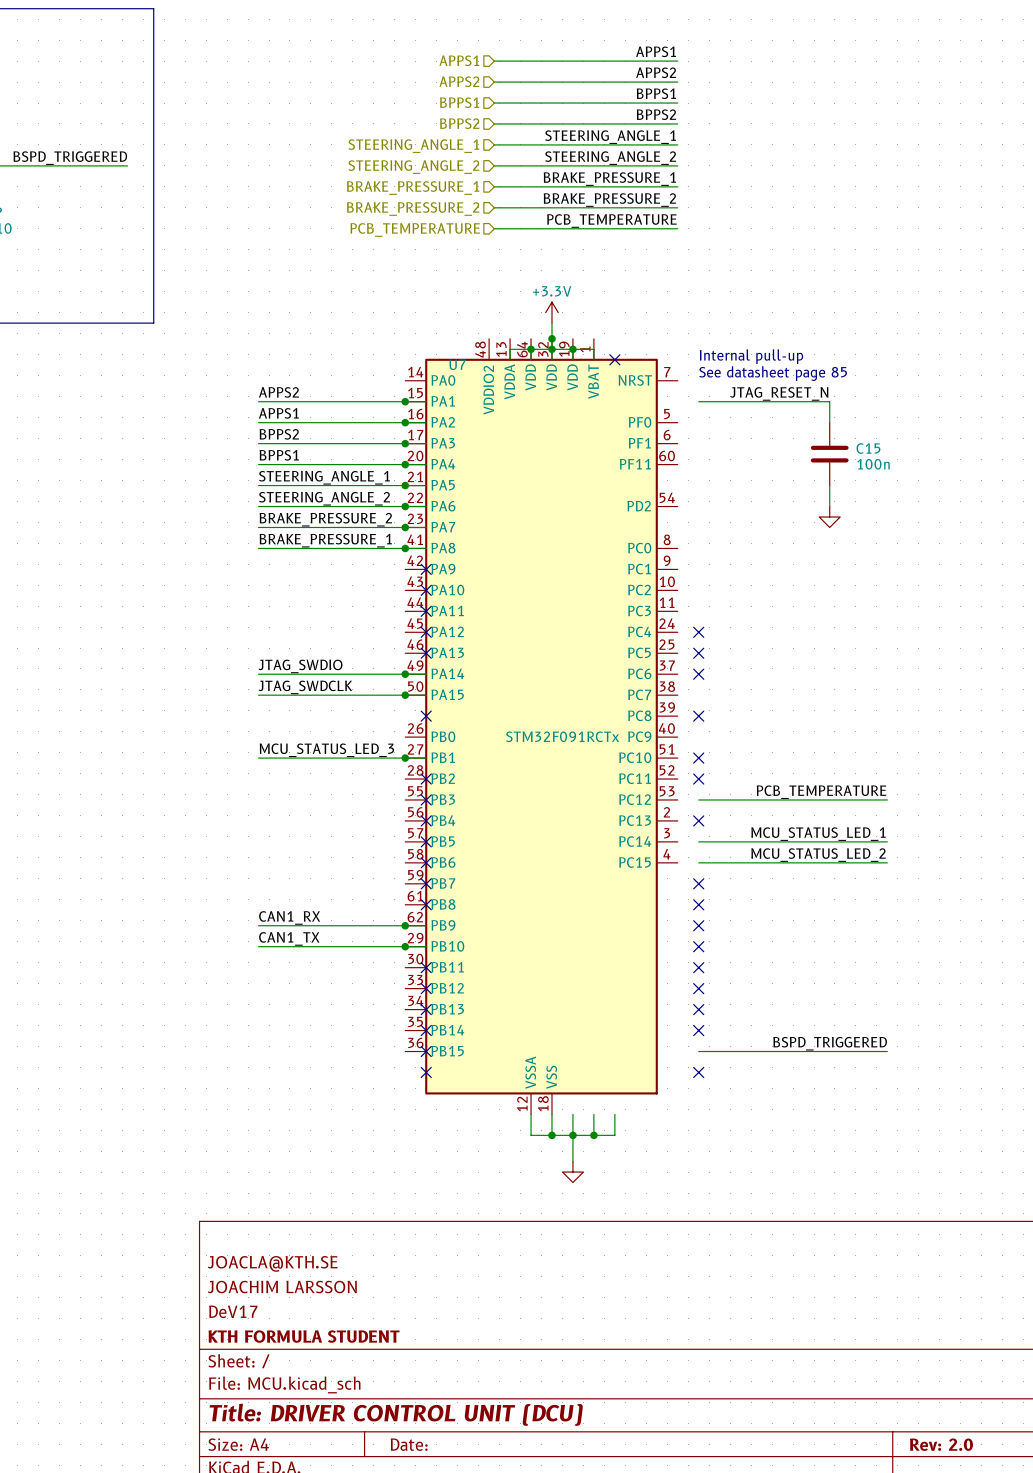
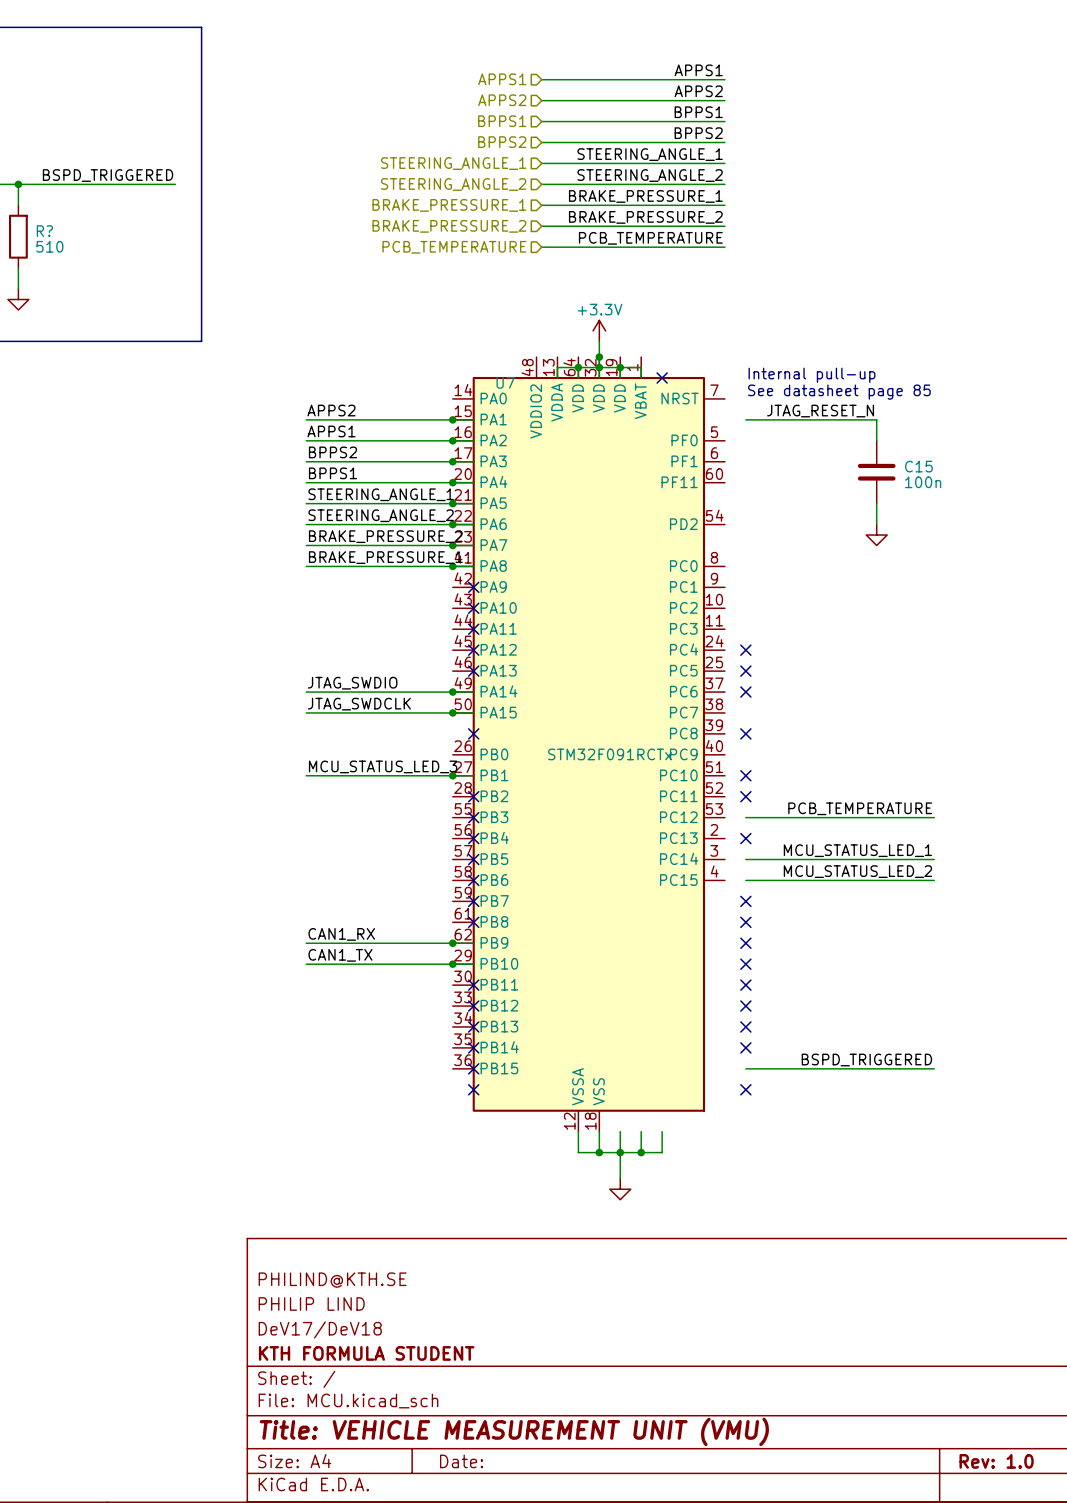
title block: JOACLA@KTH.SE (272, 1263) -> PHILIND@KTH.SE (332, 1280)
title block: JOACHIM LARSSON (282, 1287) -> PHILIP LIND (311, 1303)
title block: DeV17 (233, 1311) -> DeV17/DeV18 (320, 1329)
title block: Title: DRIVER CONTROL UNIT (DCU) (396, 1414) -> Title: VEHICLE MEASUREMENT UNIT (VMU) (514, 1431)
title block: Rev: 2.0 (941, 1444) -> Rev: 1.0 (996, 1461)

